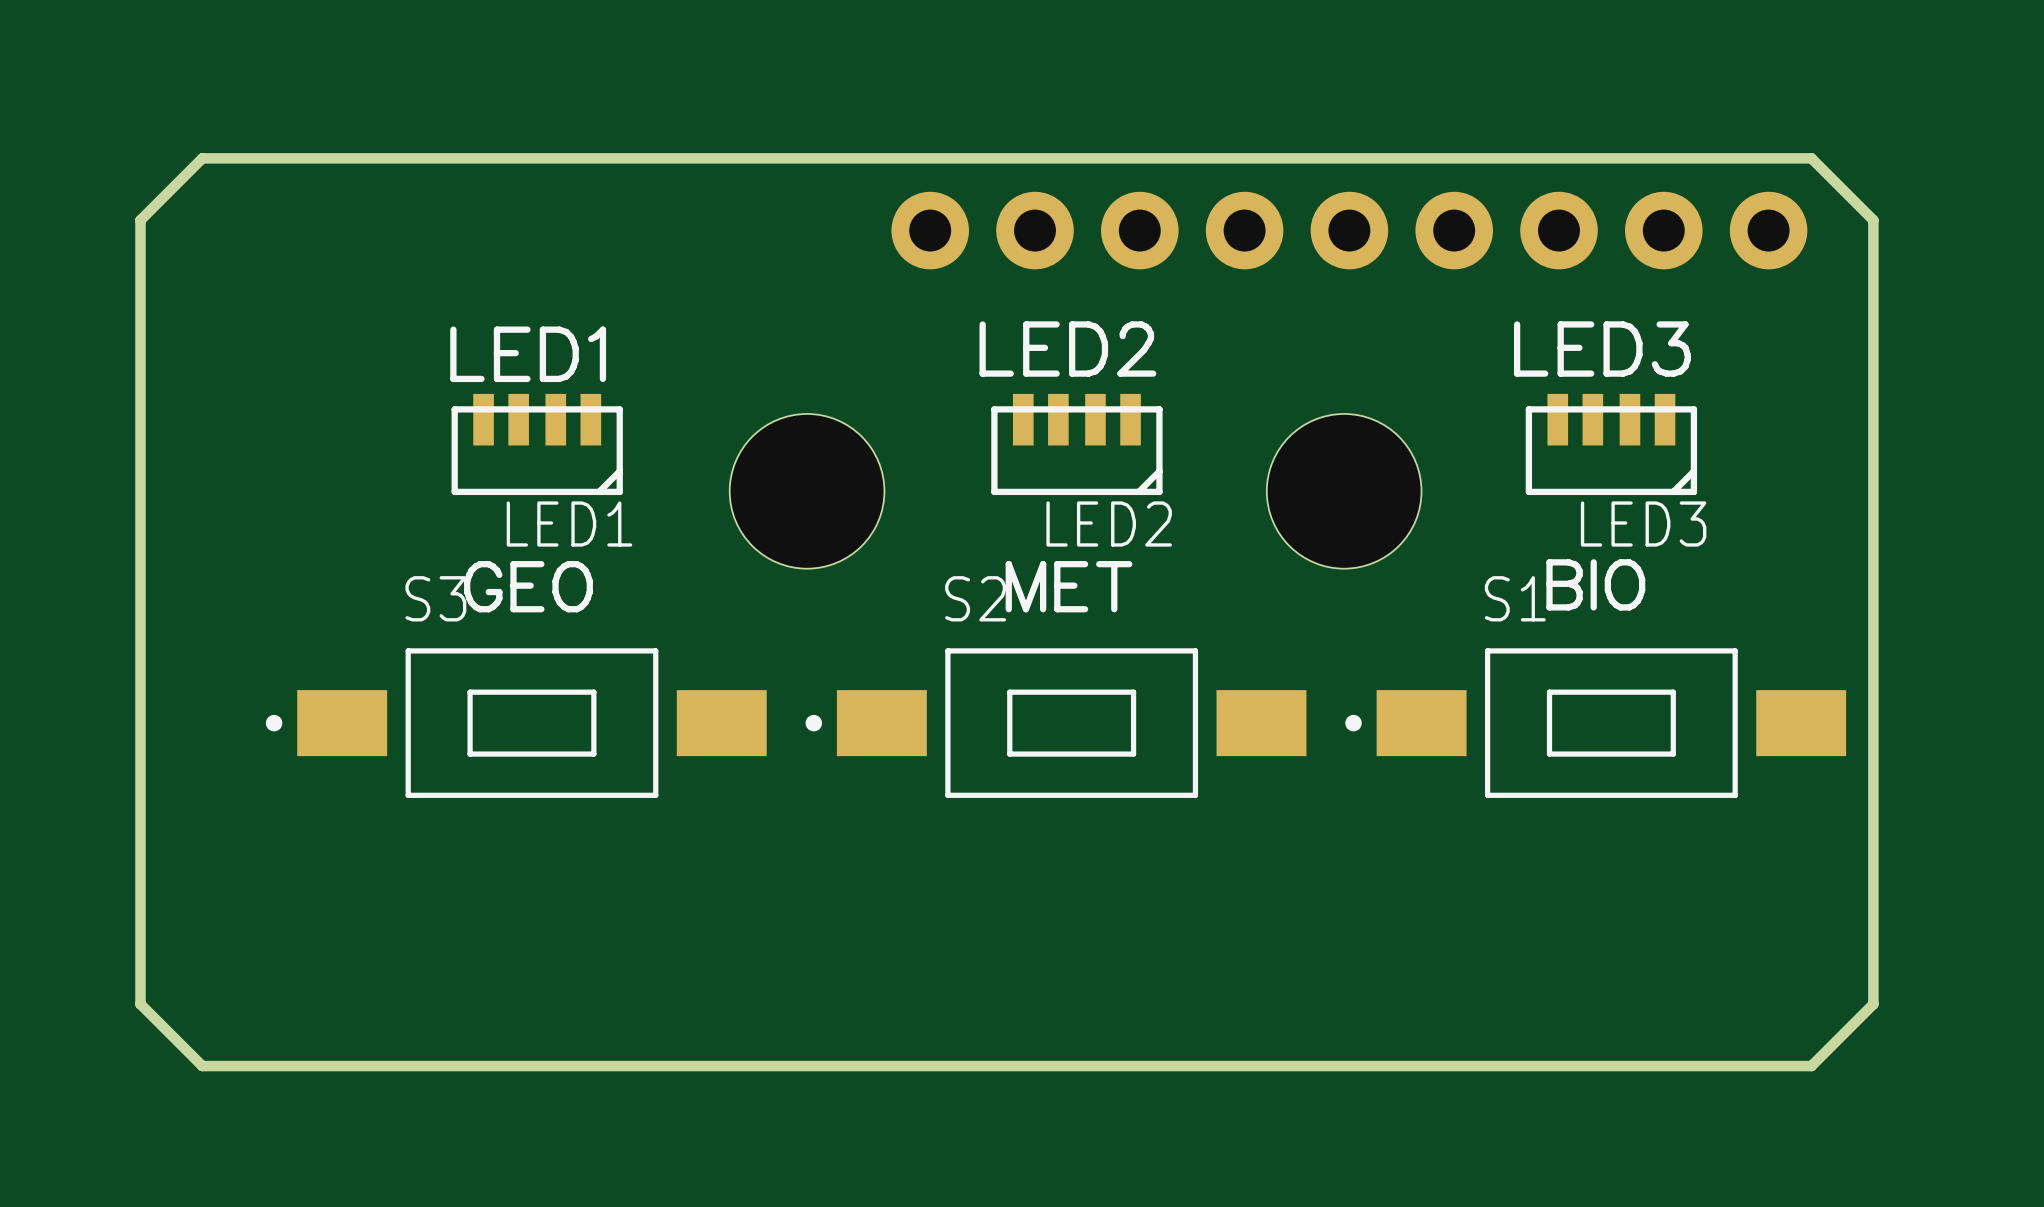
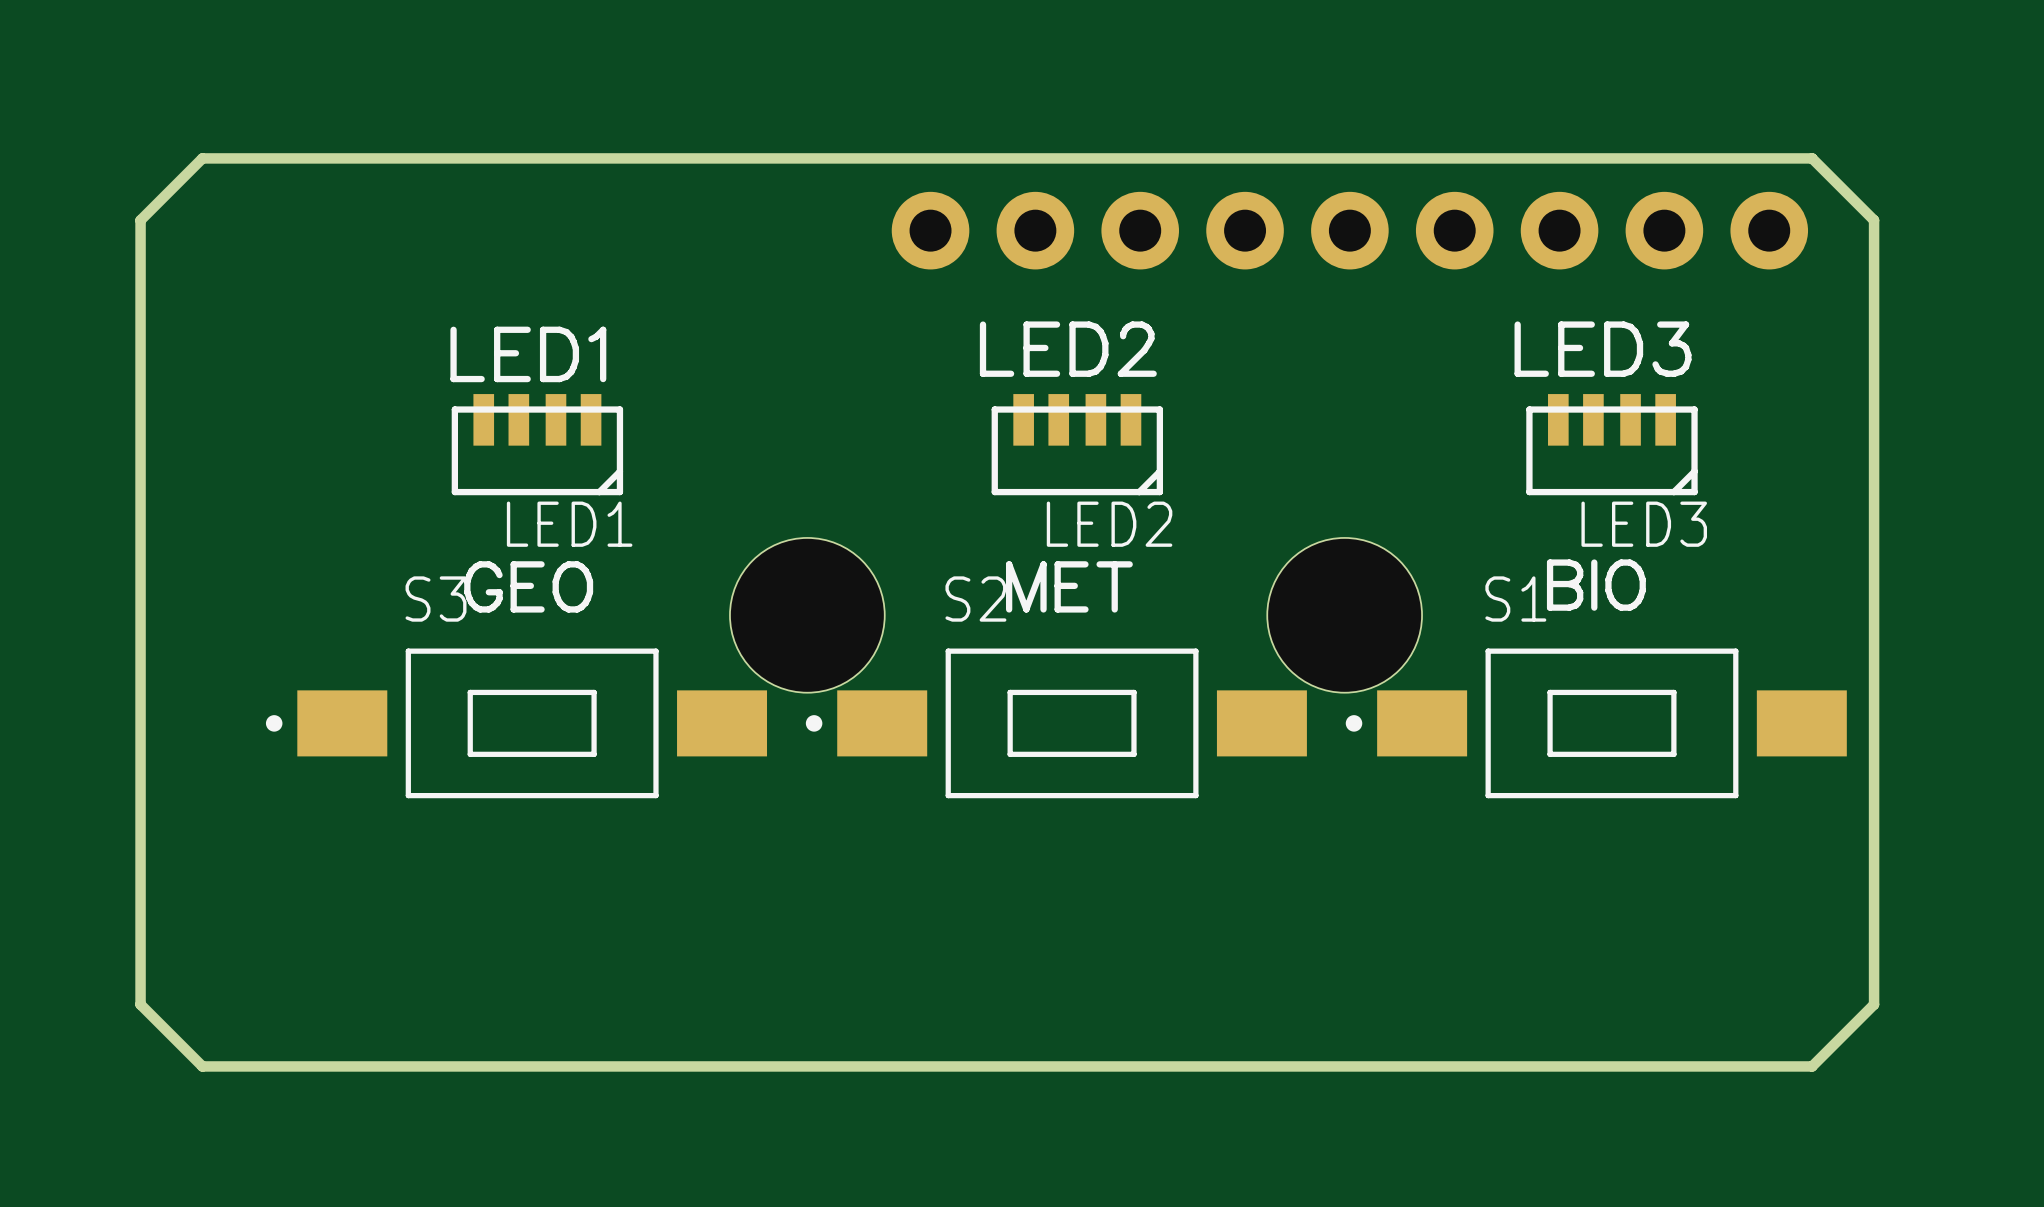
hole position: (807, 491) -> (807, 615)
hole position: (1344, 491) -> (1344, 615)

